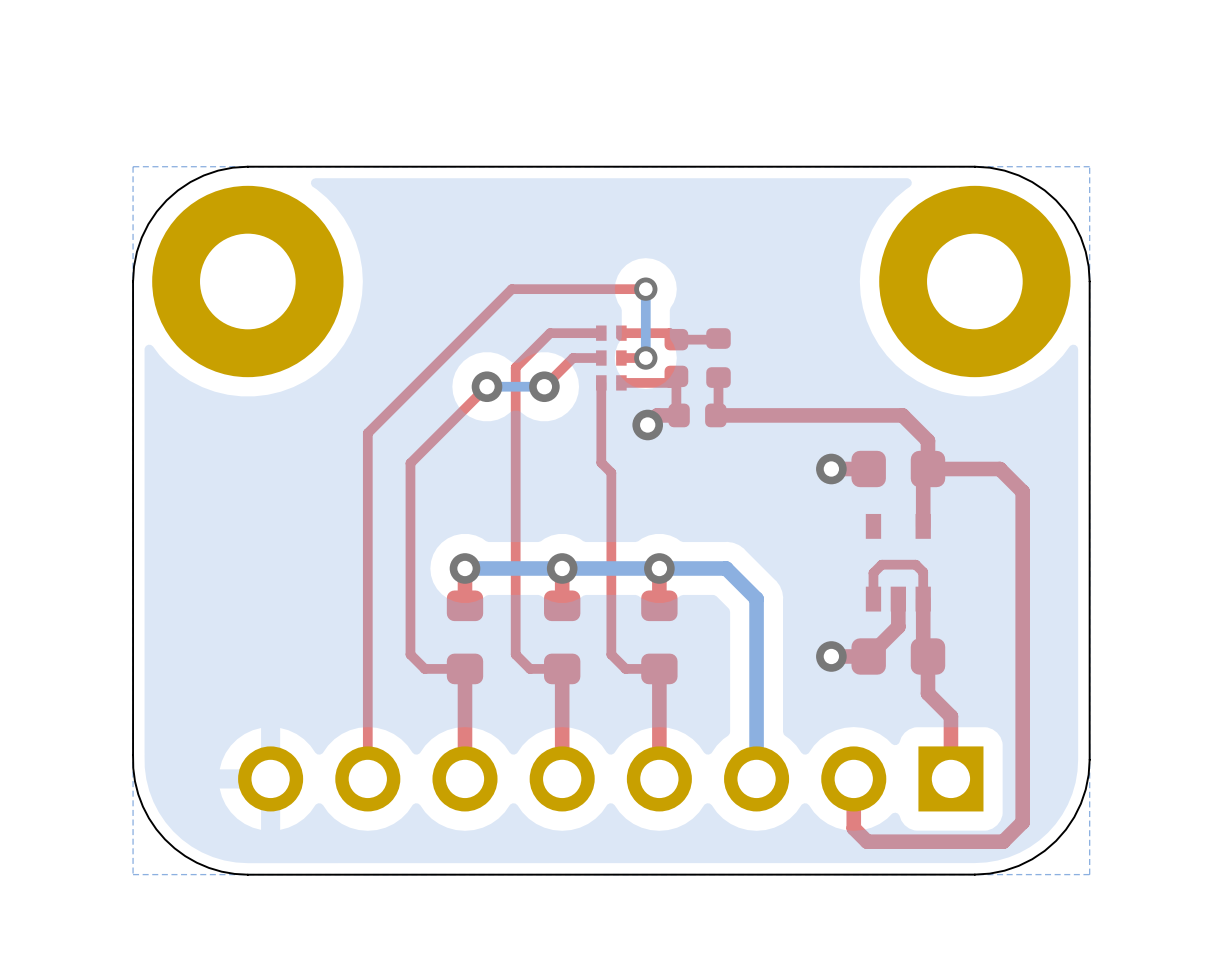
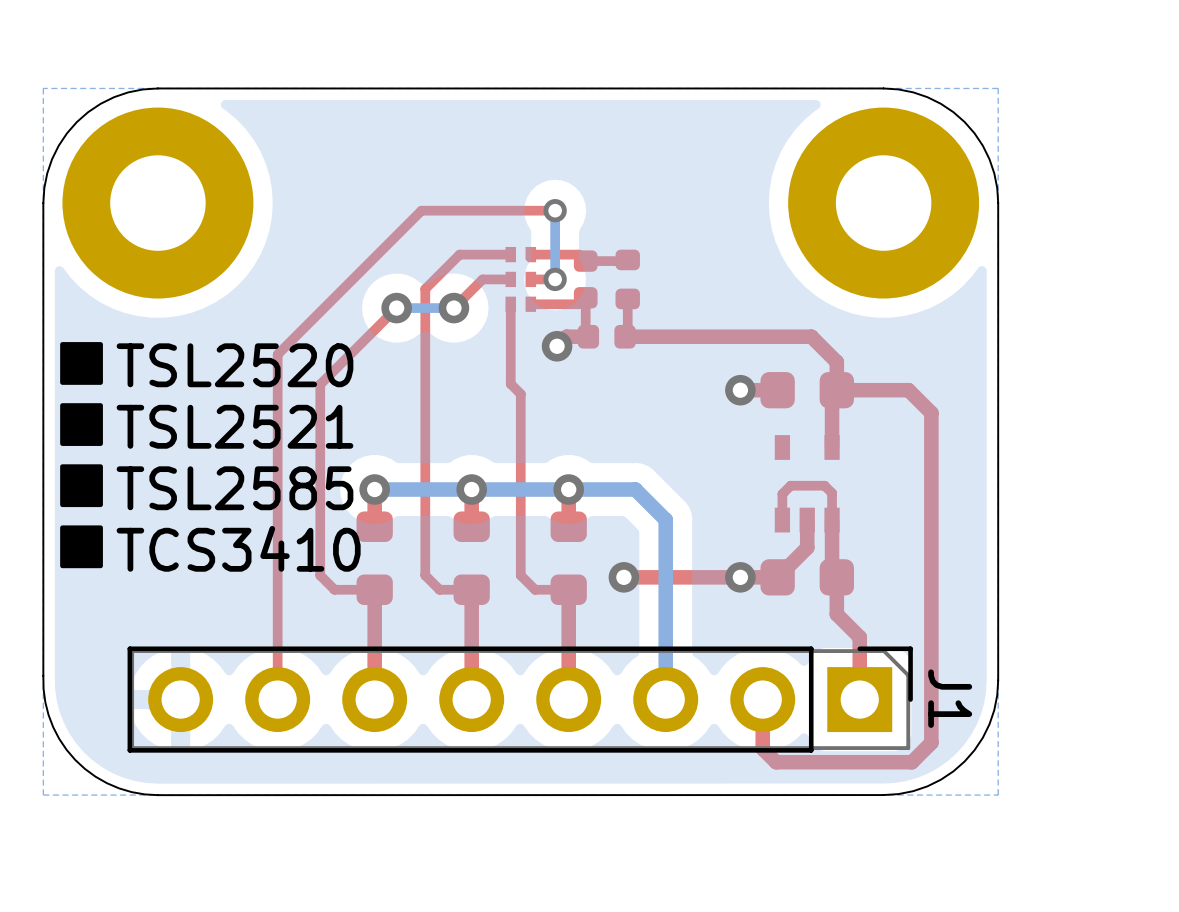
drawing: none -> [60, 342, 103, 569]
text: none -> TSL2520 (234, 365)
text: none -> TSL2521 (234, 426)
text: none -> TSL2585 (234, 488)
text: none -> TCS3410 (238, 548)
via: none -> (623, 577)
top track: none -> (740, 577) (623, 577)
J1 side: top (610, 778) -> bottom (520, 699)

